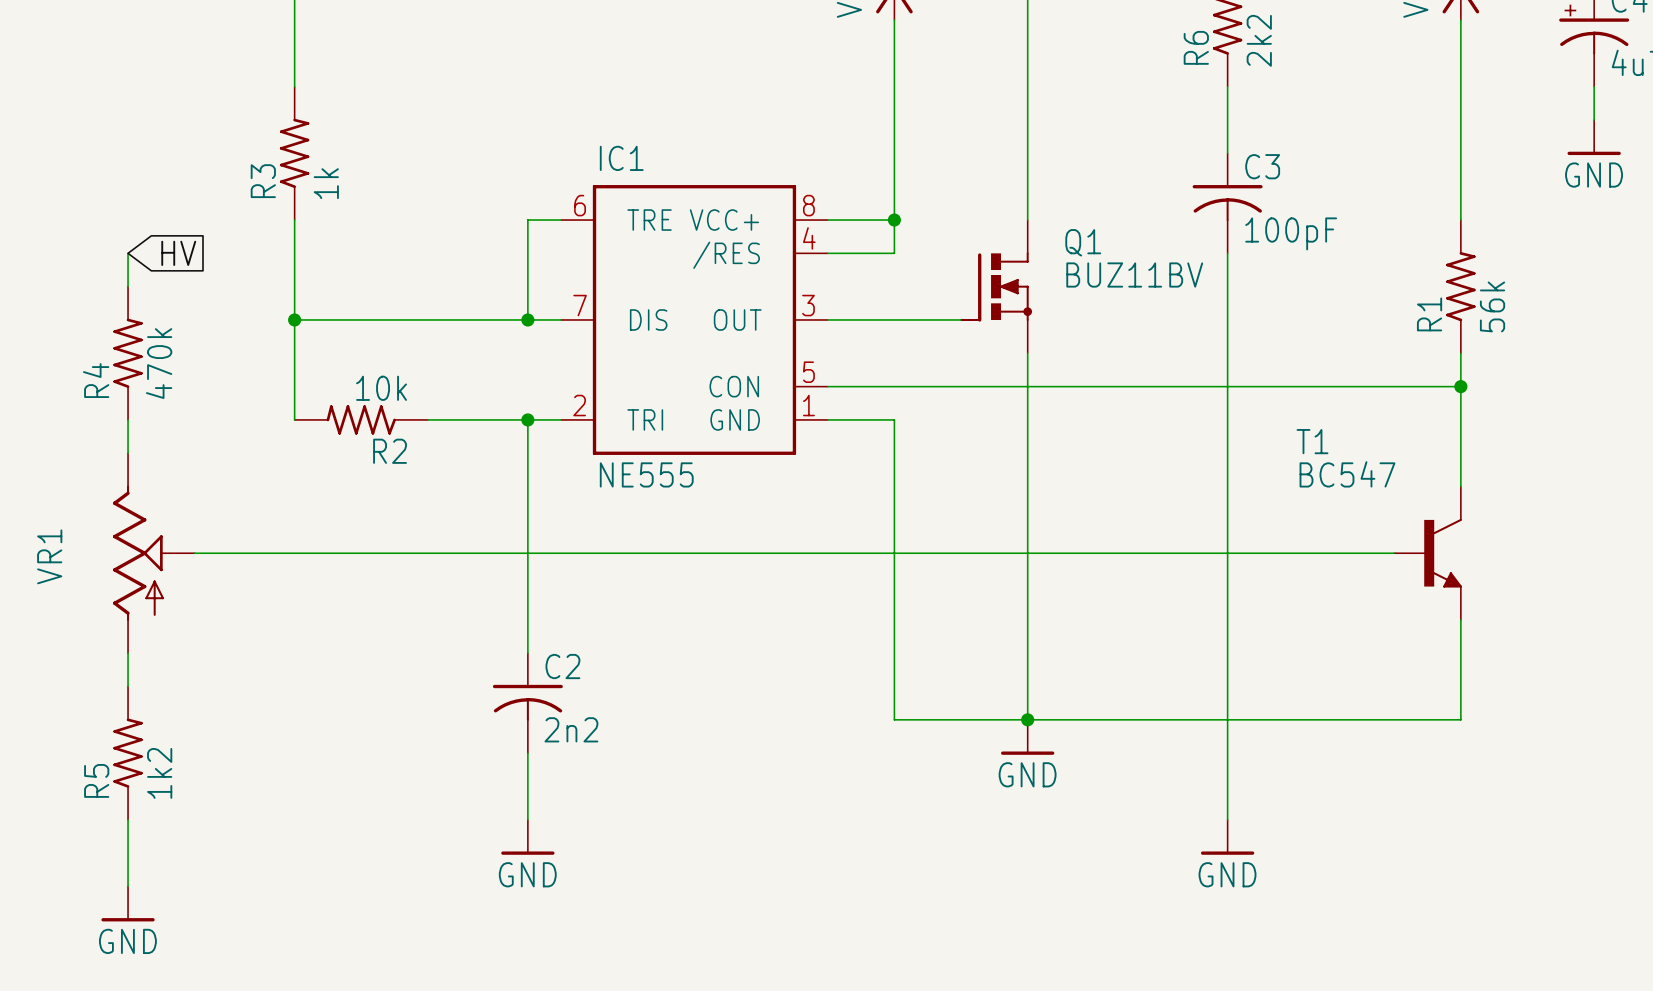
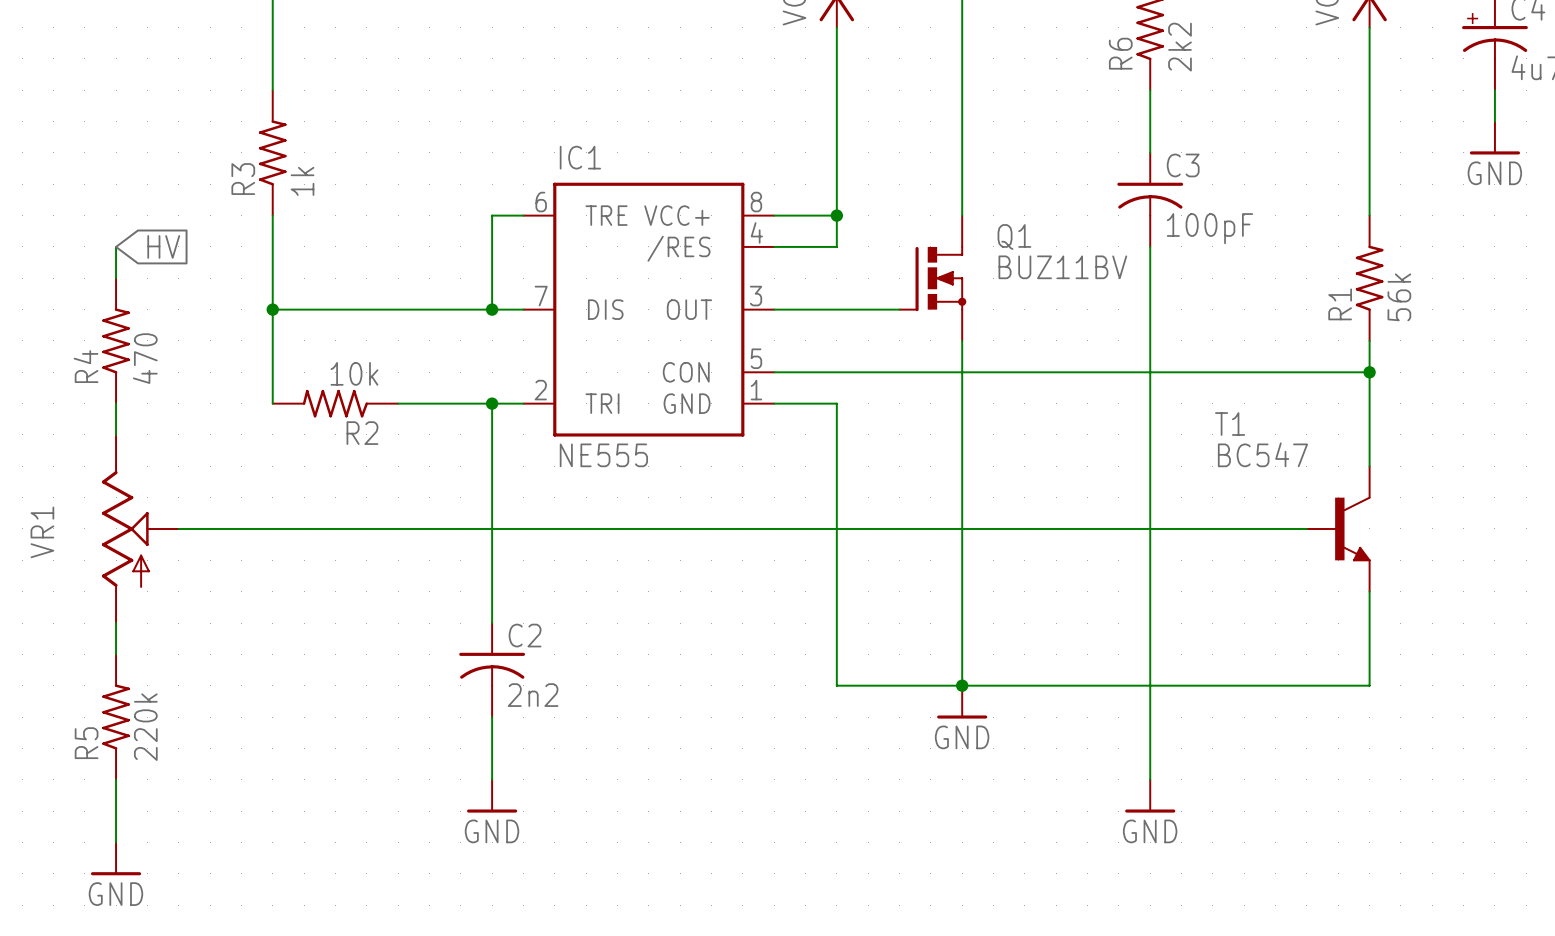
R4 value: 470k (159, 363) -> 470 (145, 358)
R5 value: 1k2 (159, 773) -> 220k (145, 727)

